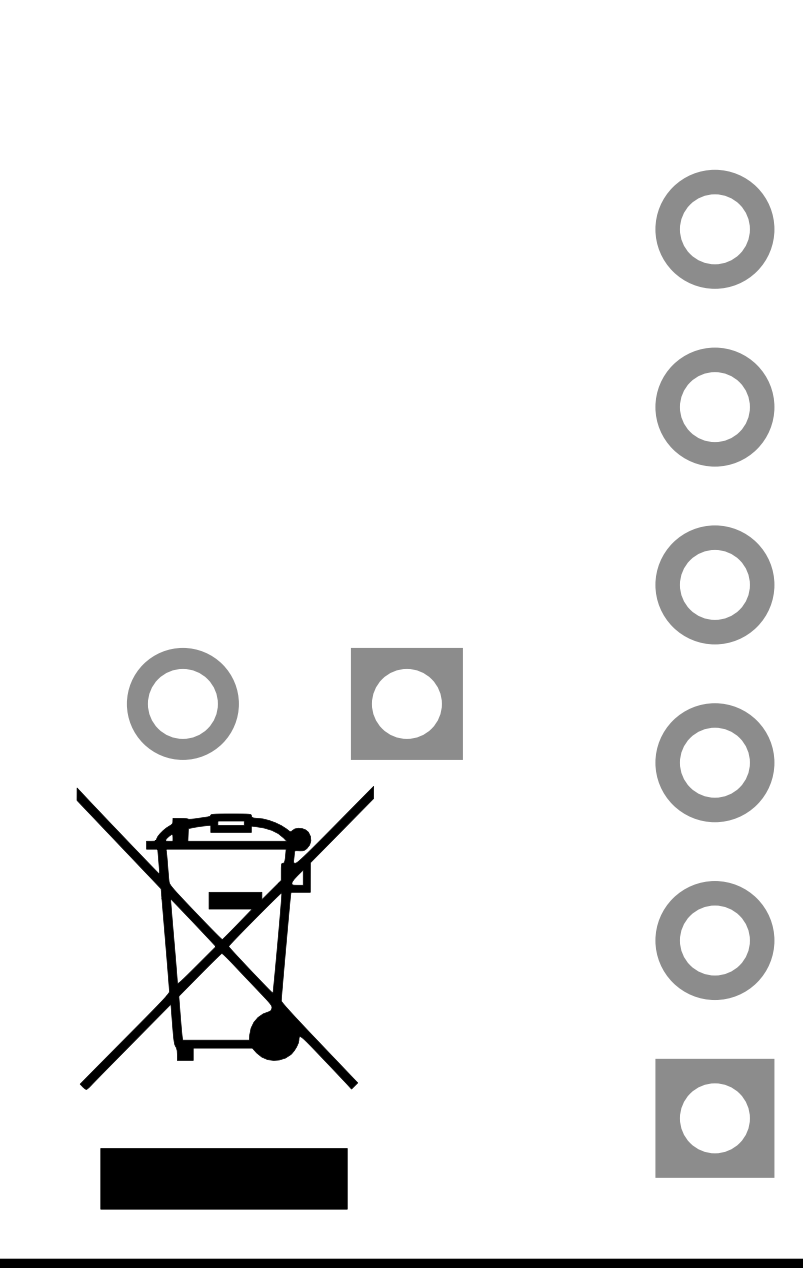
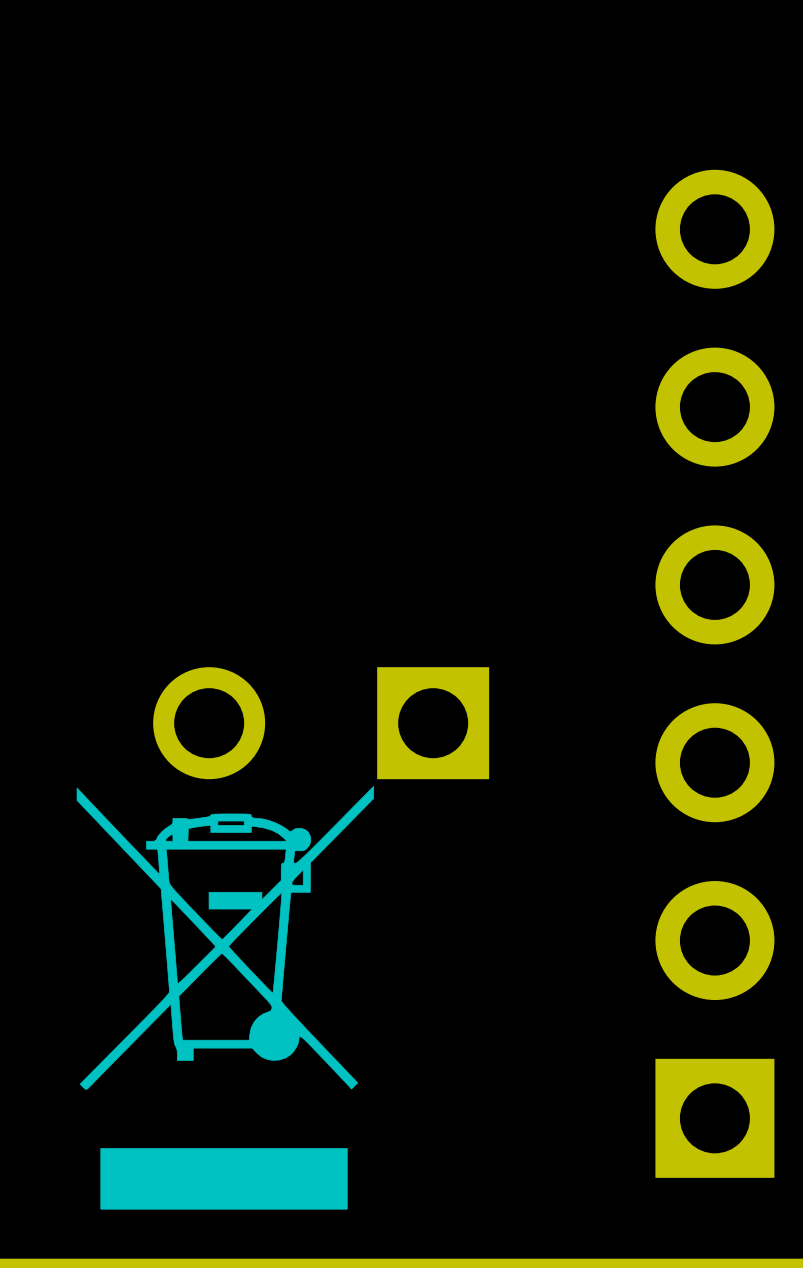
part position: (294, 703) -> (321, 723)

